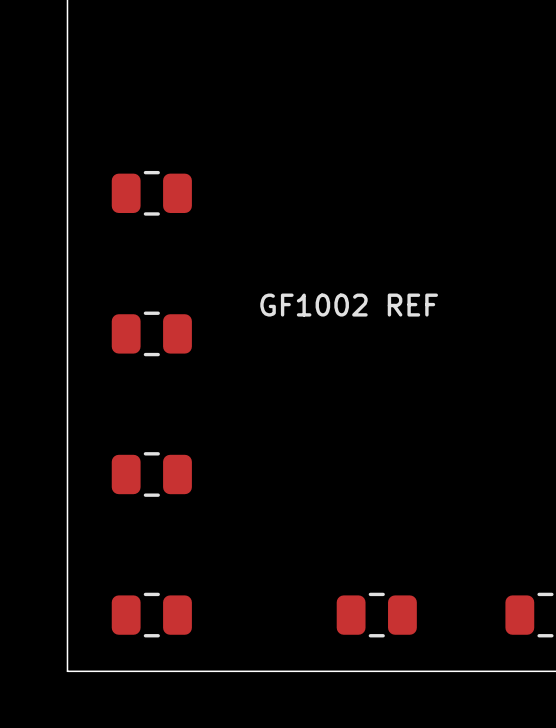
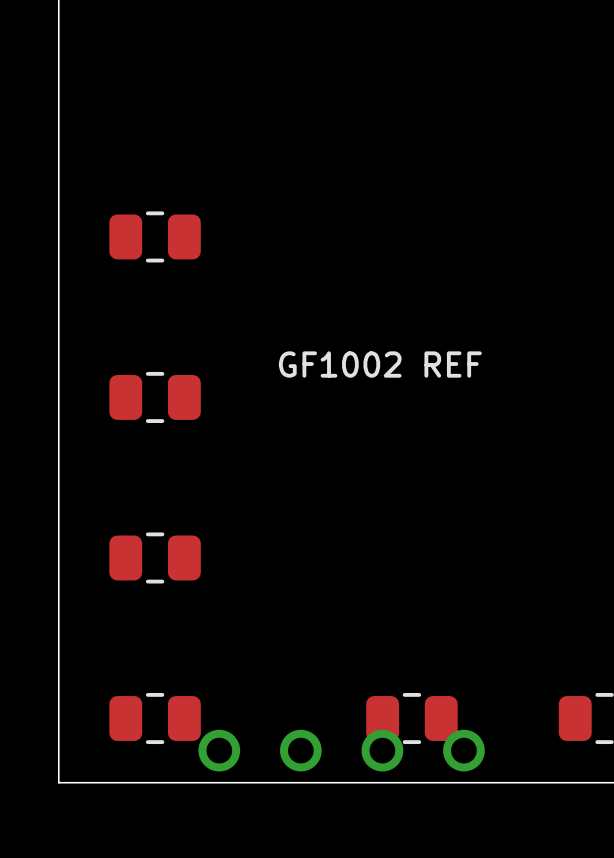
part: none -> (341, 750)

